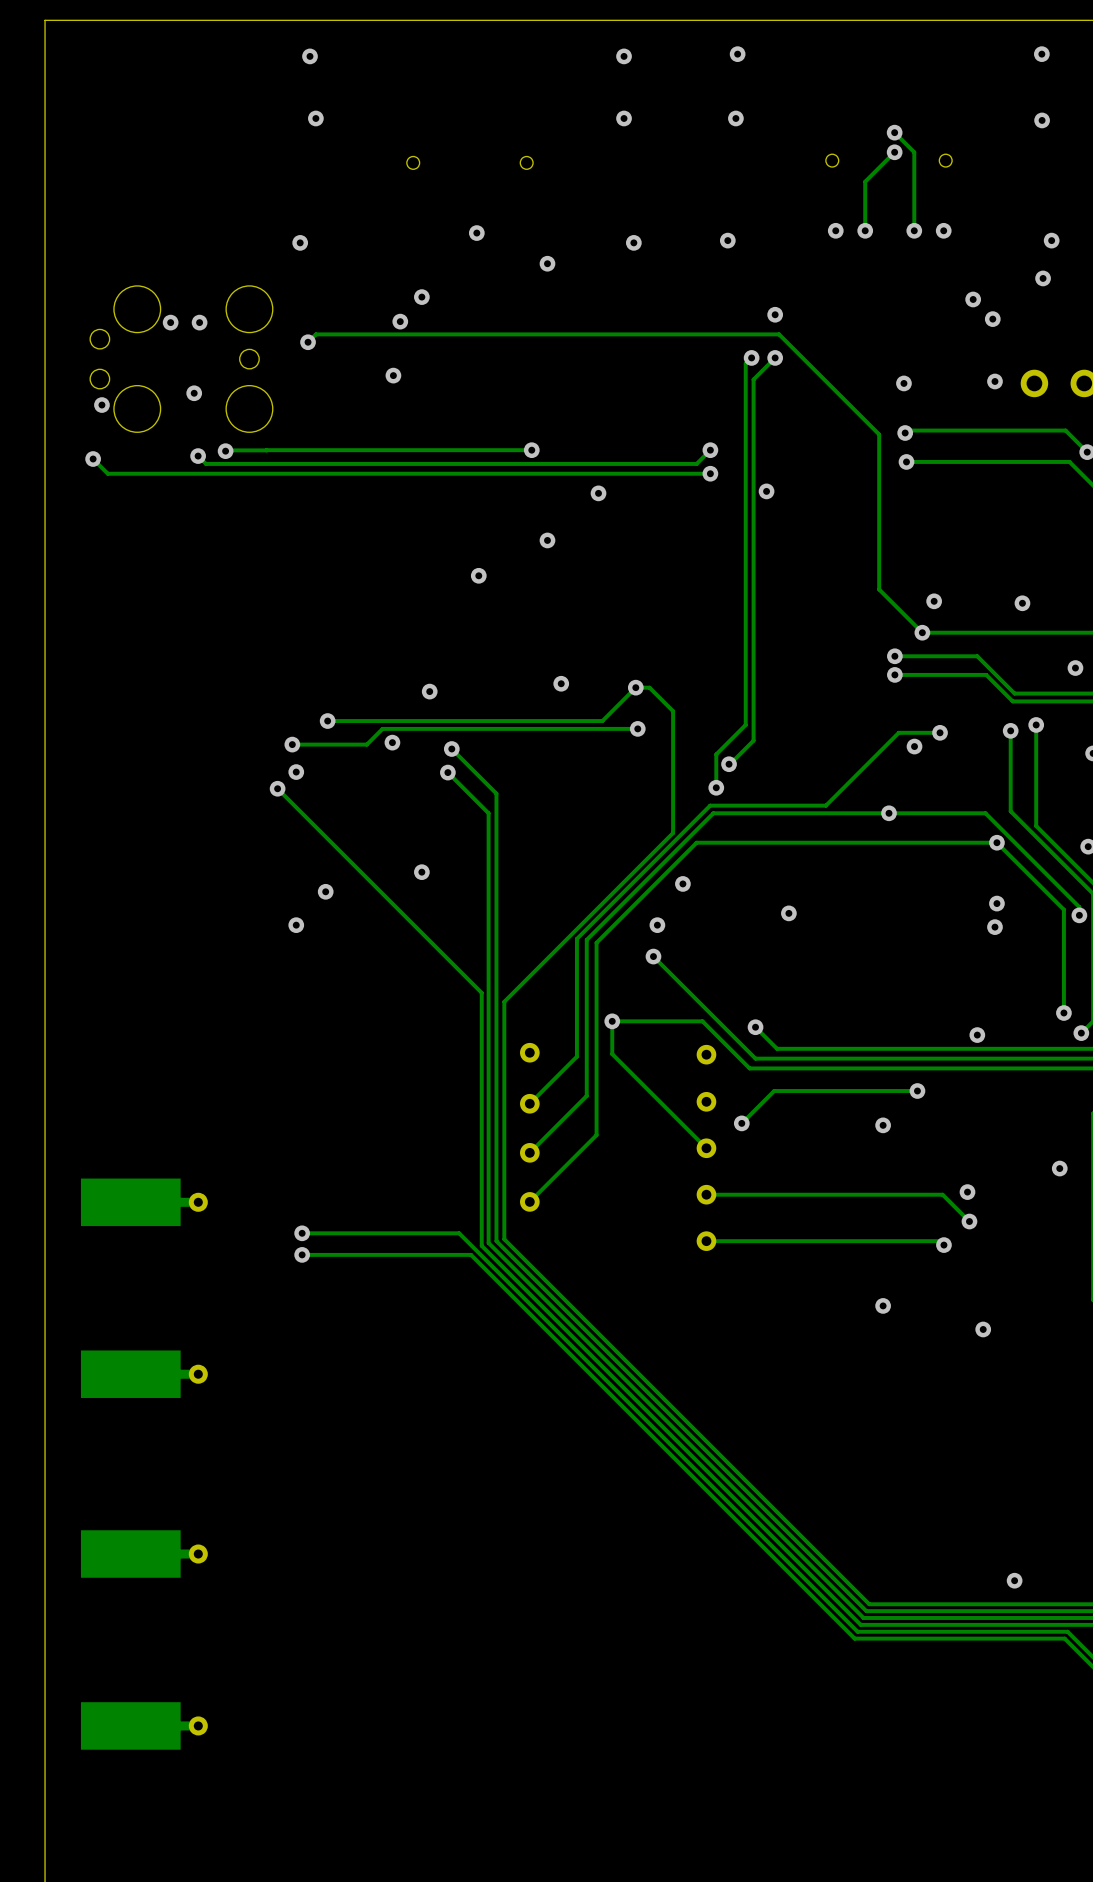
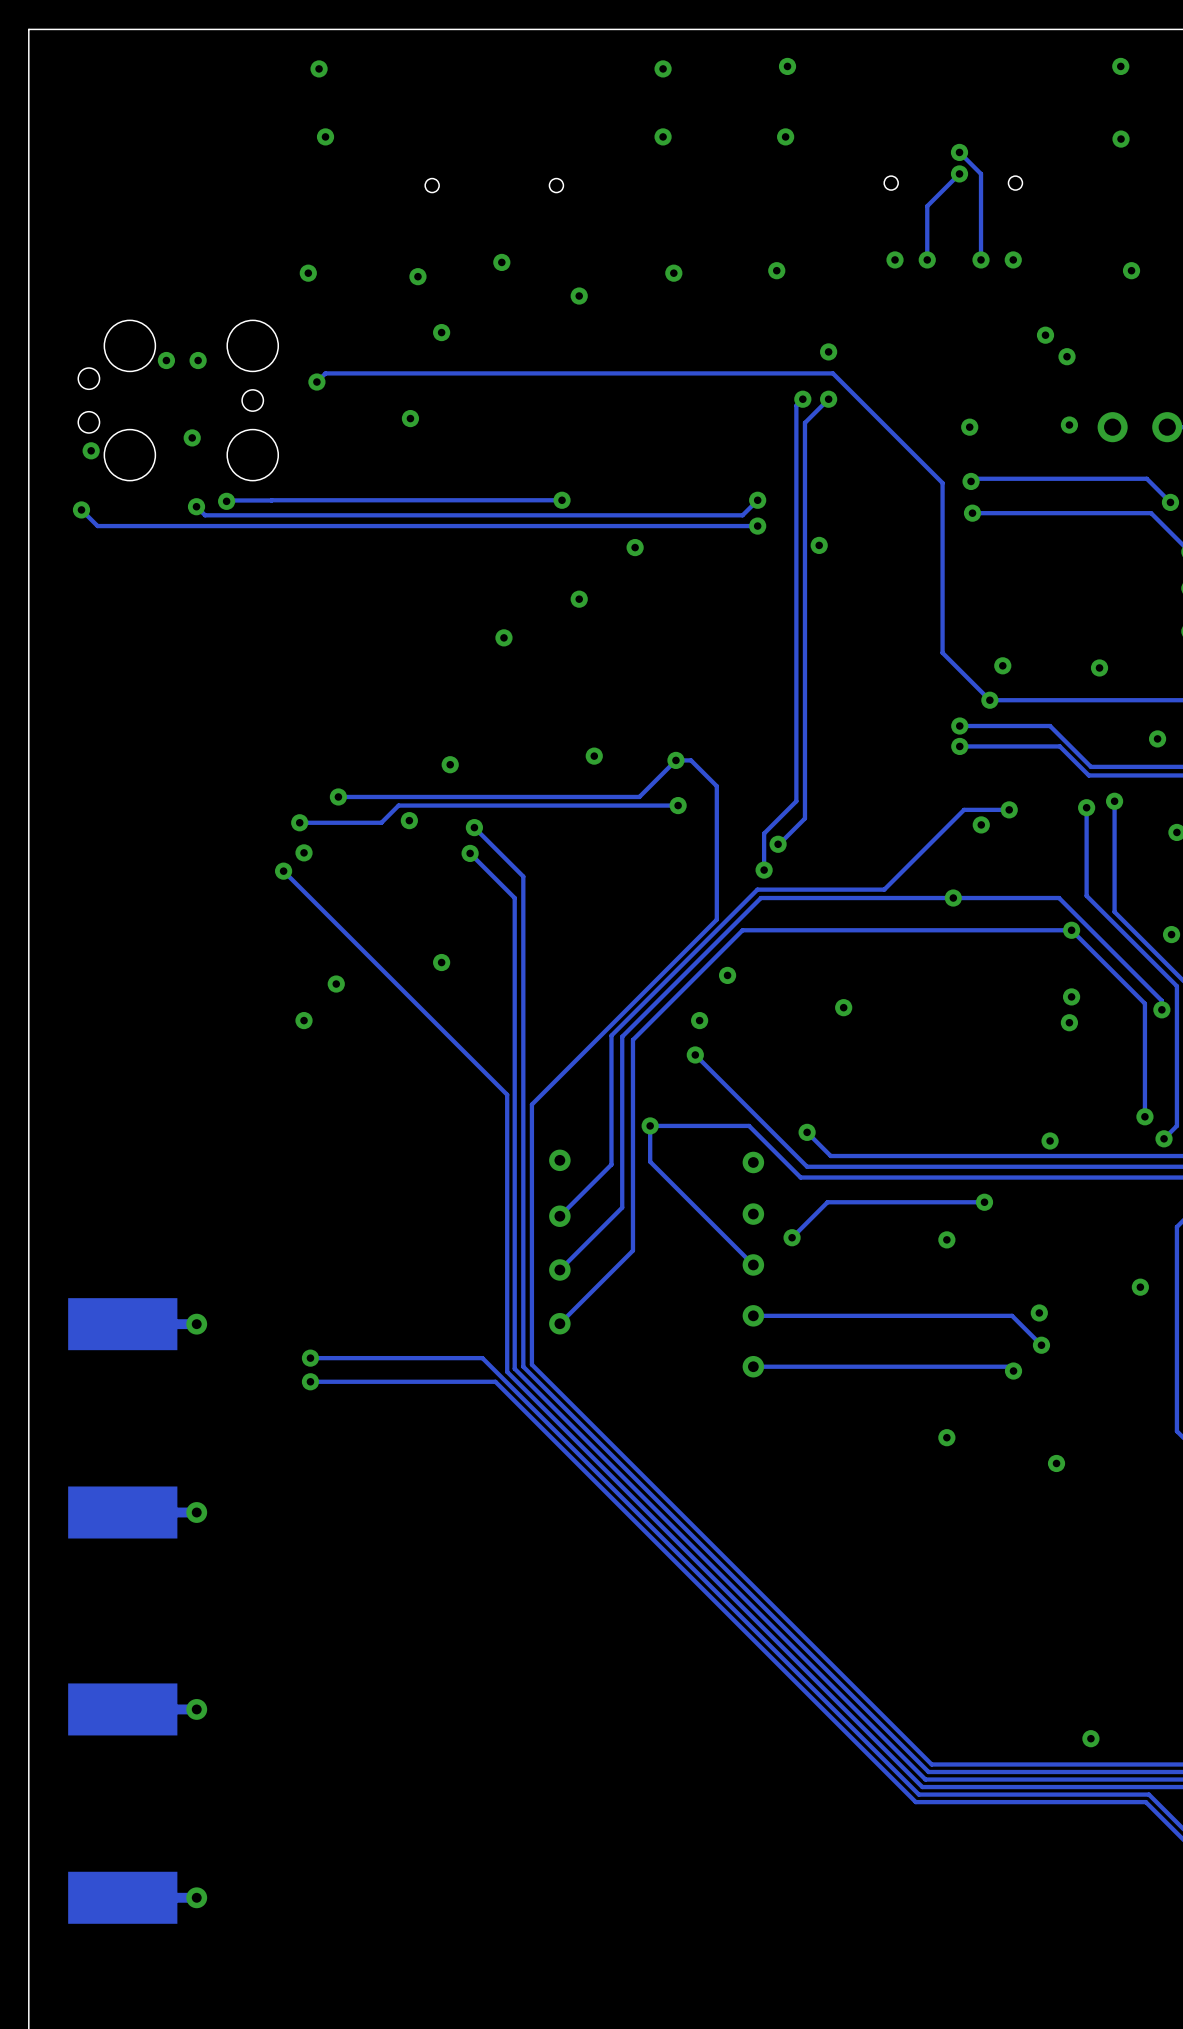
via: (1043, 278) -> none
via position: (400, 321) -> (417, 276)

